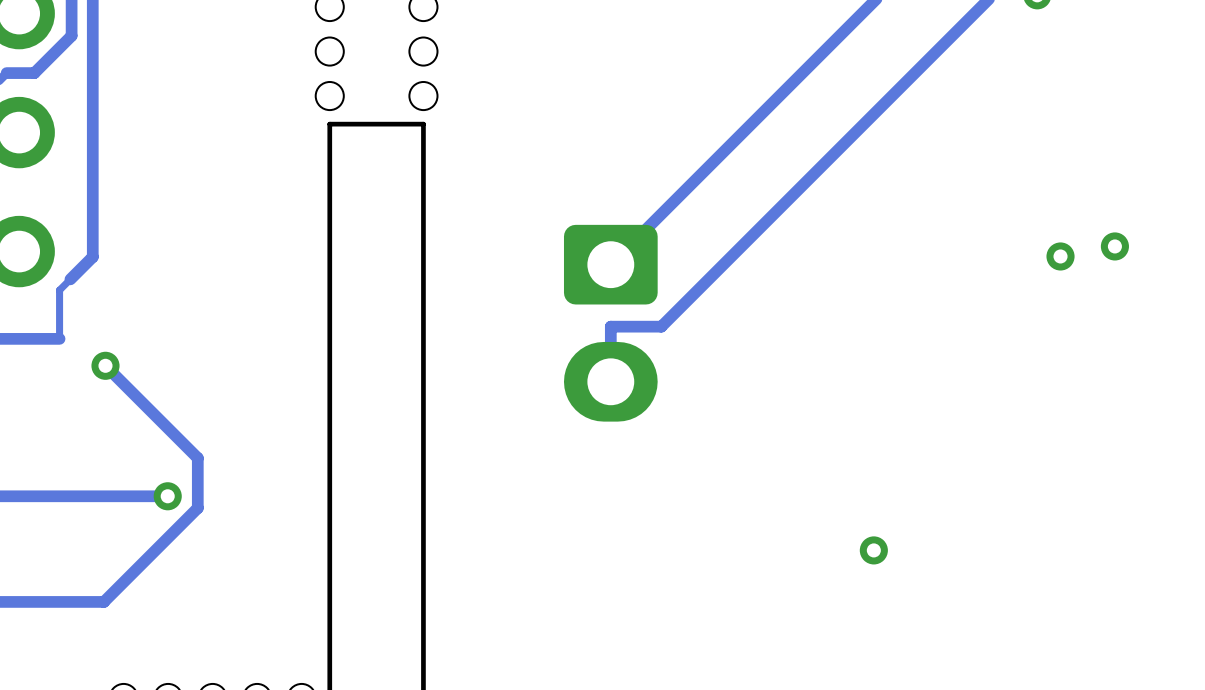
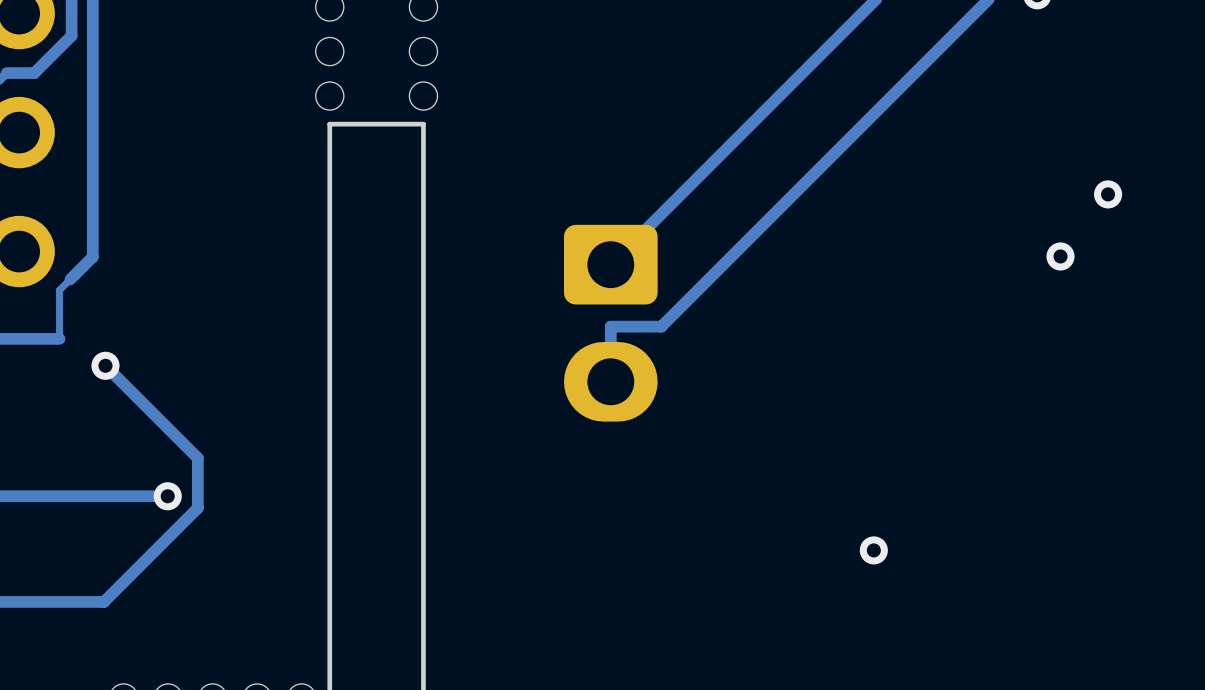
via position: (1114, 246) -> (1108, 194)

